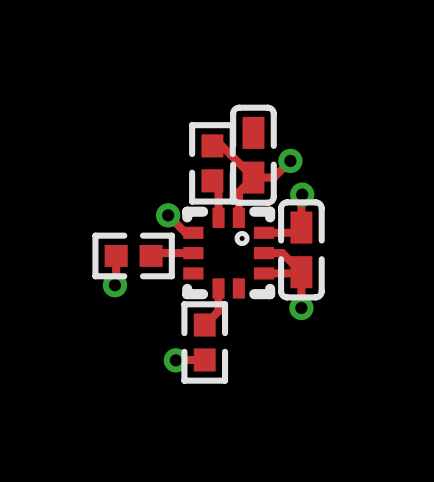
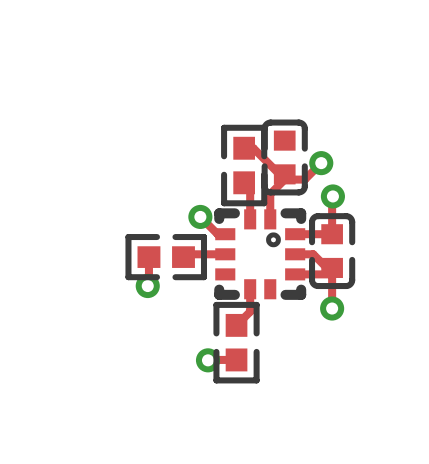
part footprint: [230, 104, 277, 206] -> [261, 119, 308, 196]
part footprint: [278, 199, 325, 301] -> [309, 213, 356, 290]

